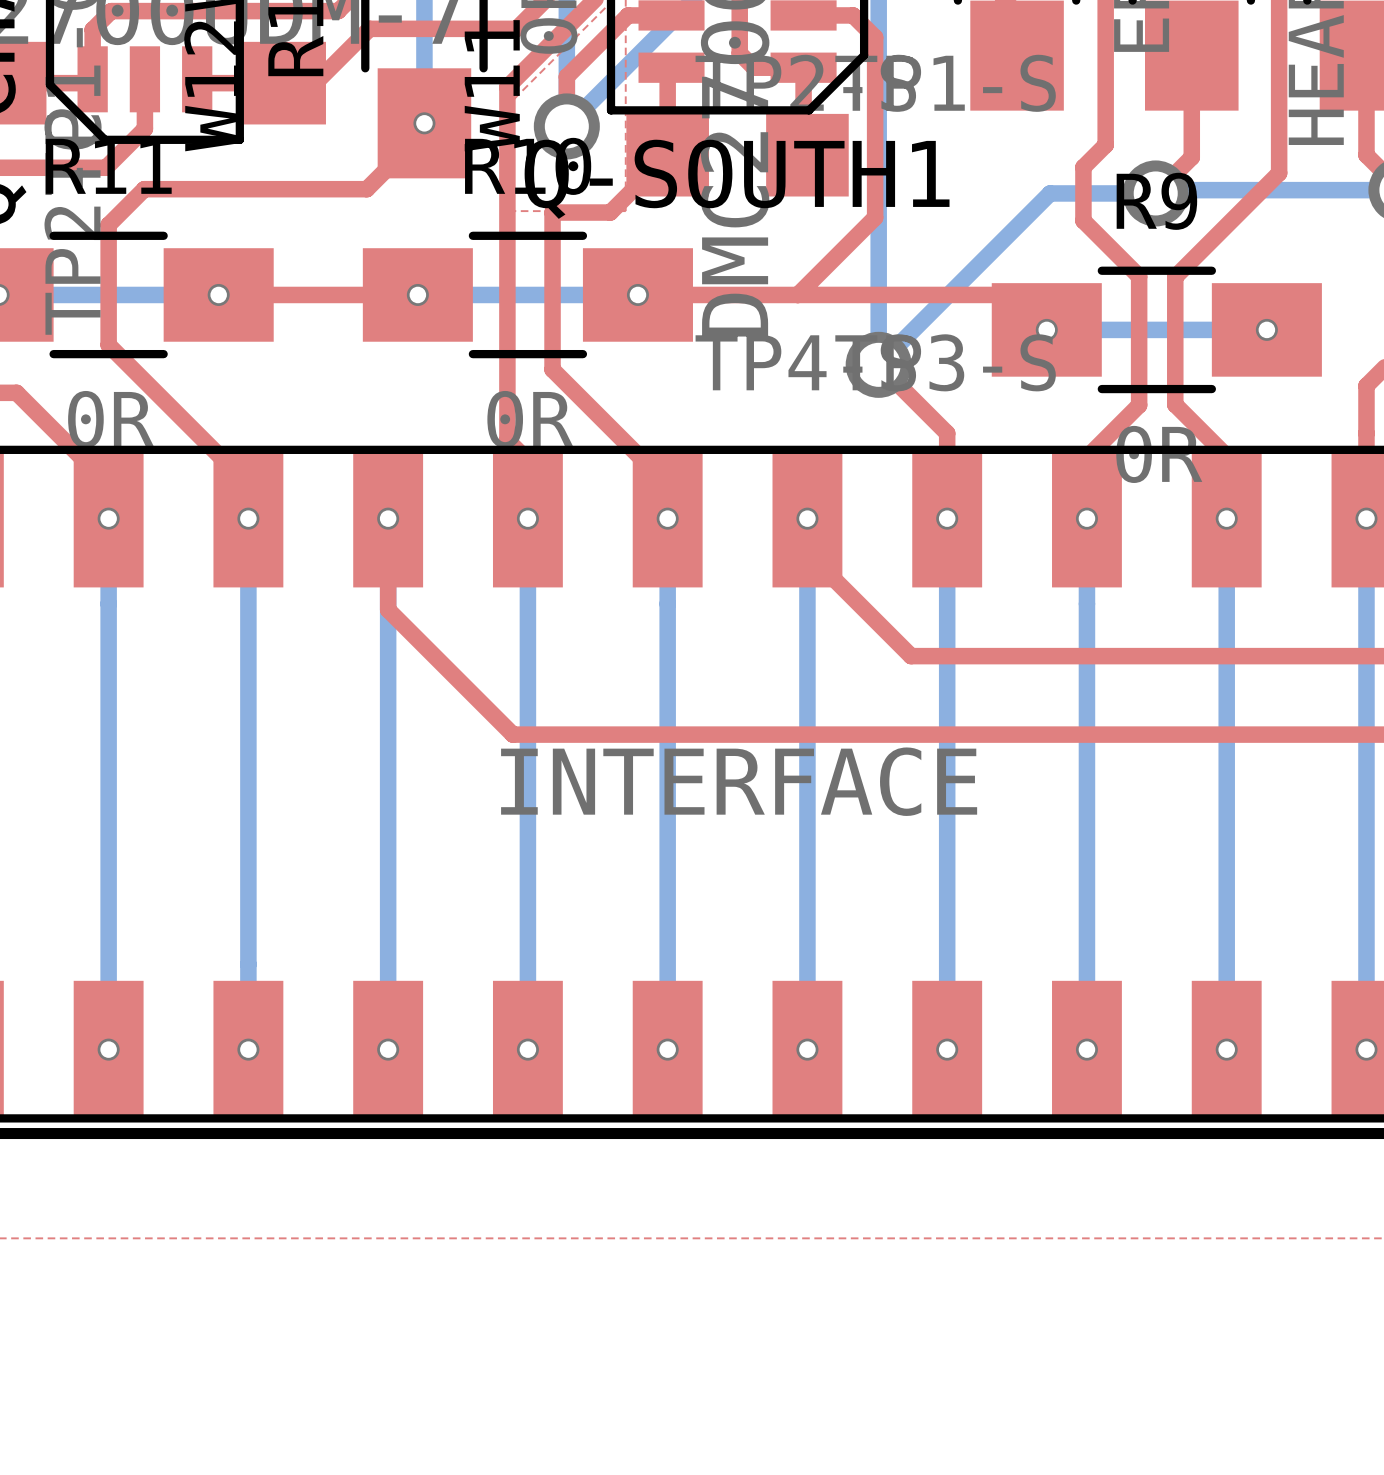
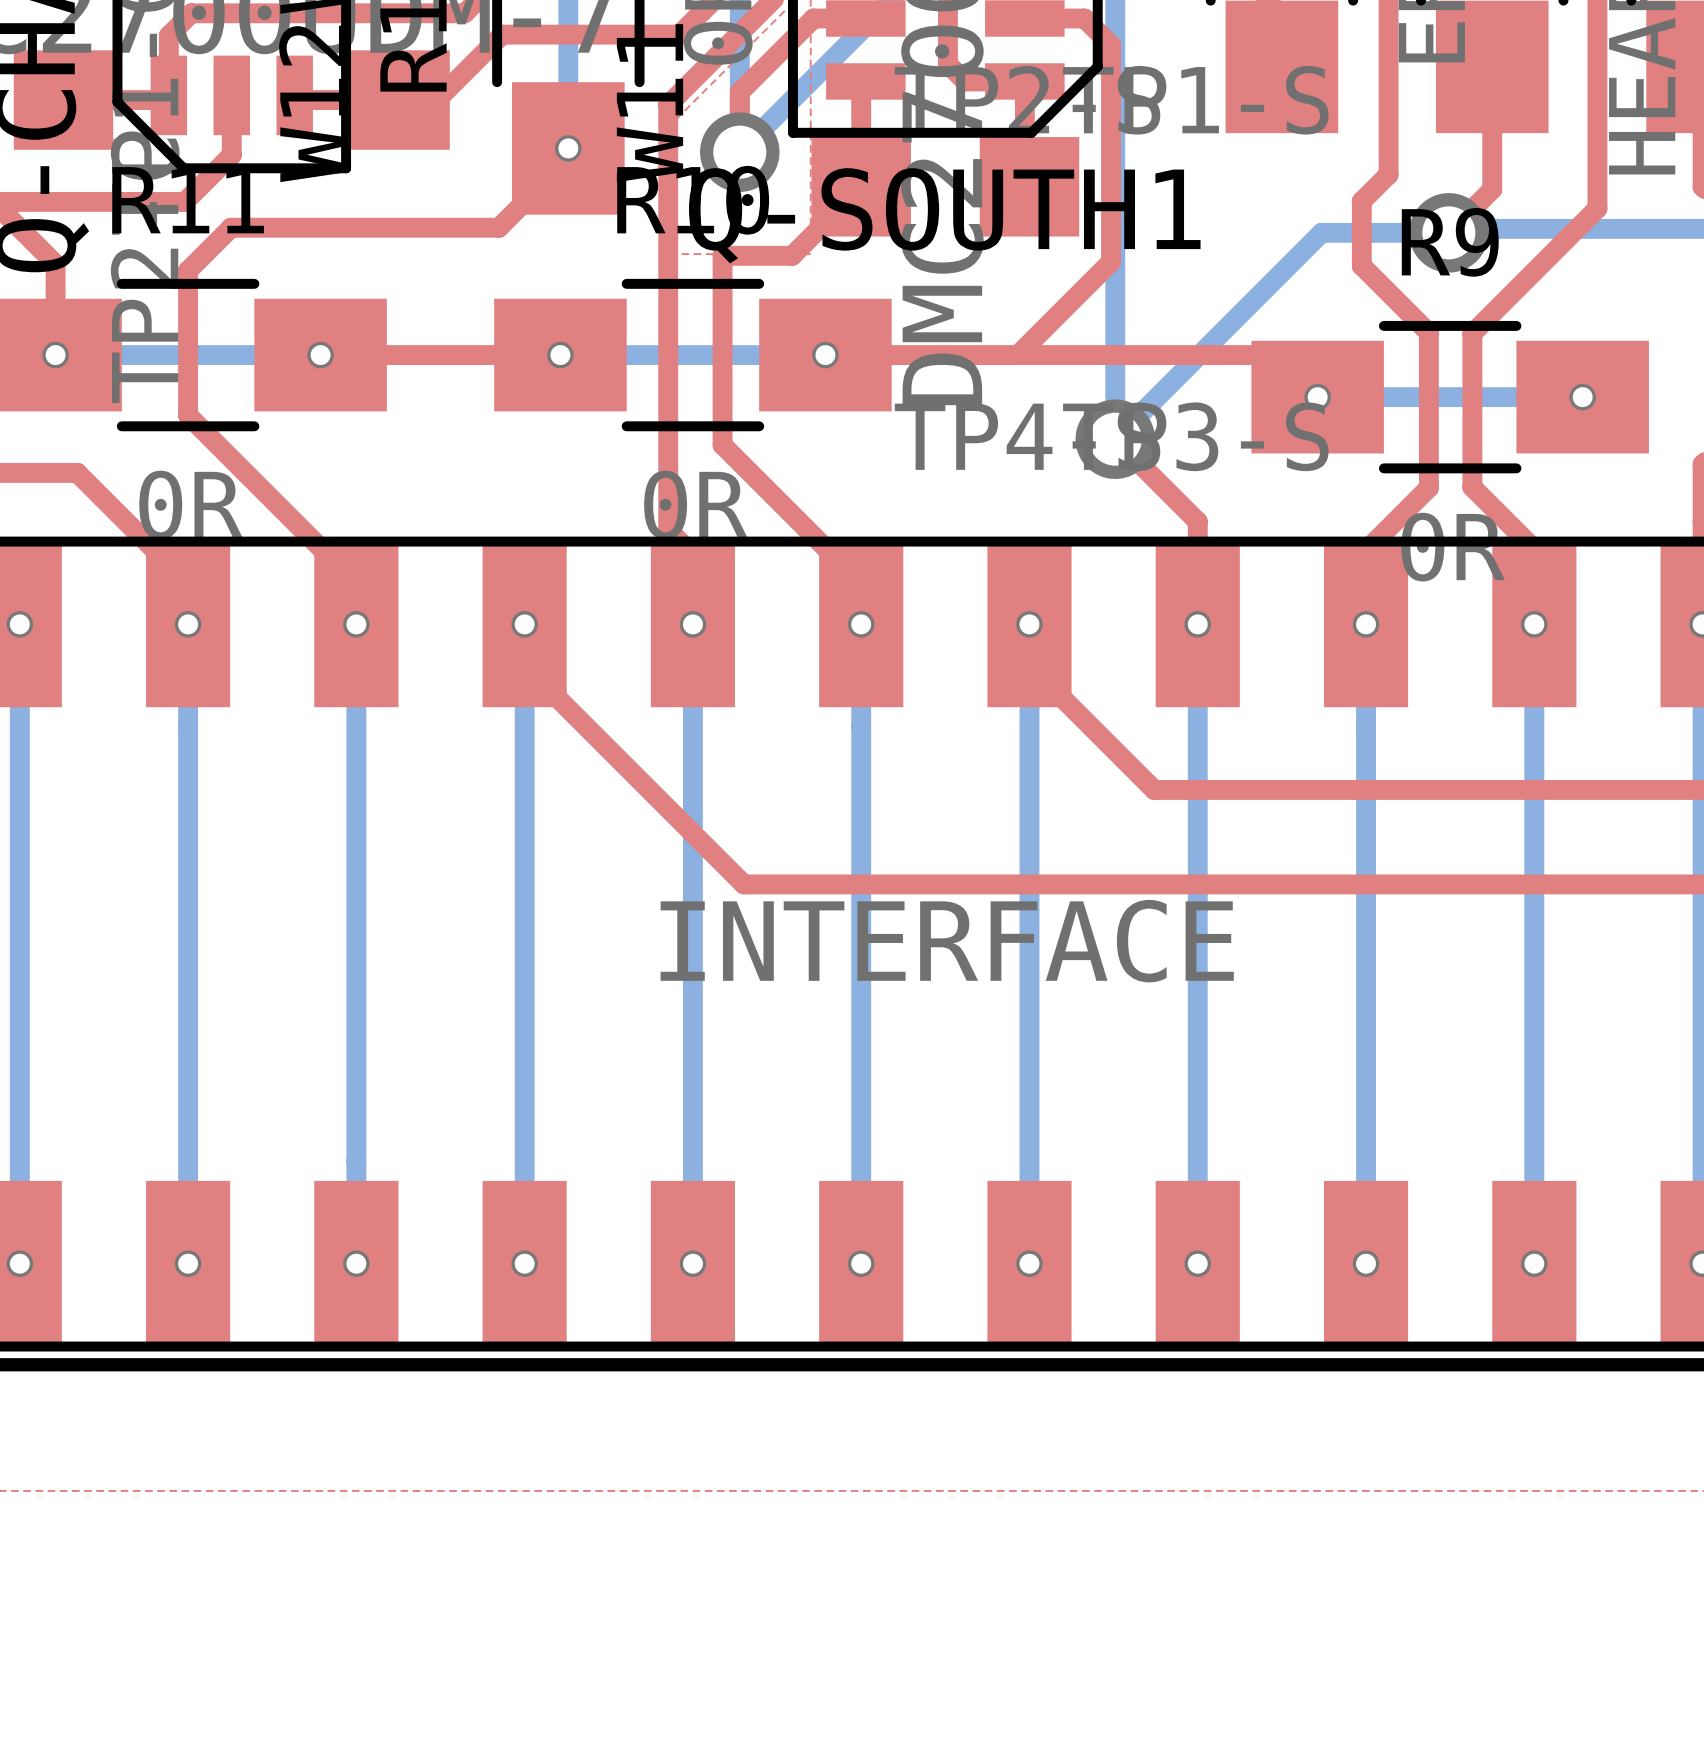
top track: (388, 552) (388, 609) (512, 734) (570, 734) -> (524, 665) (743, 884)

